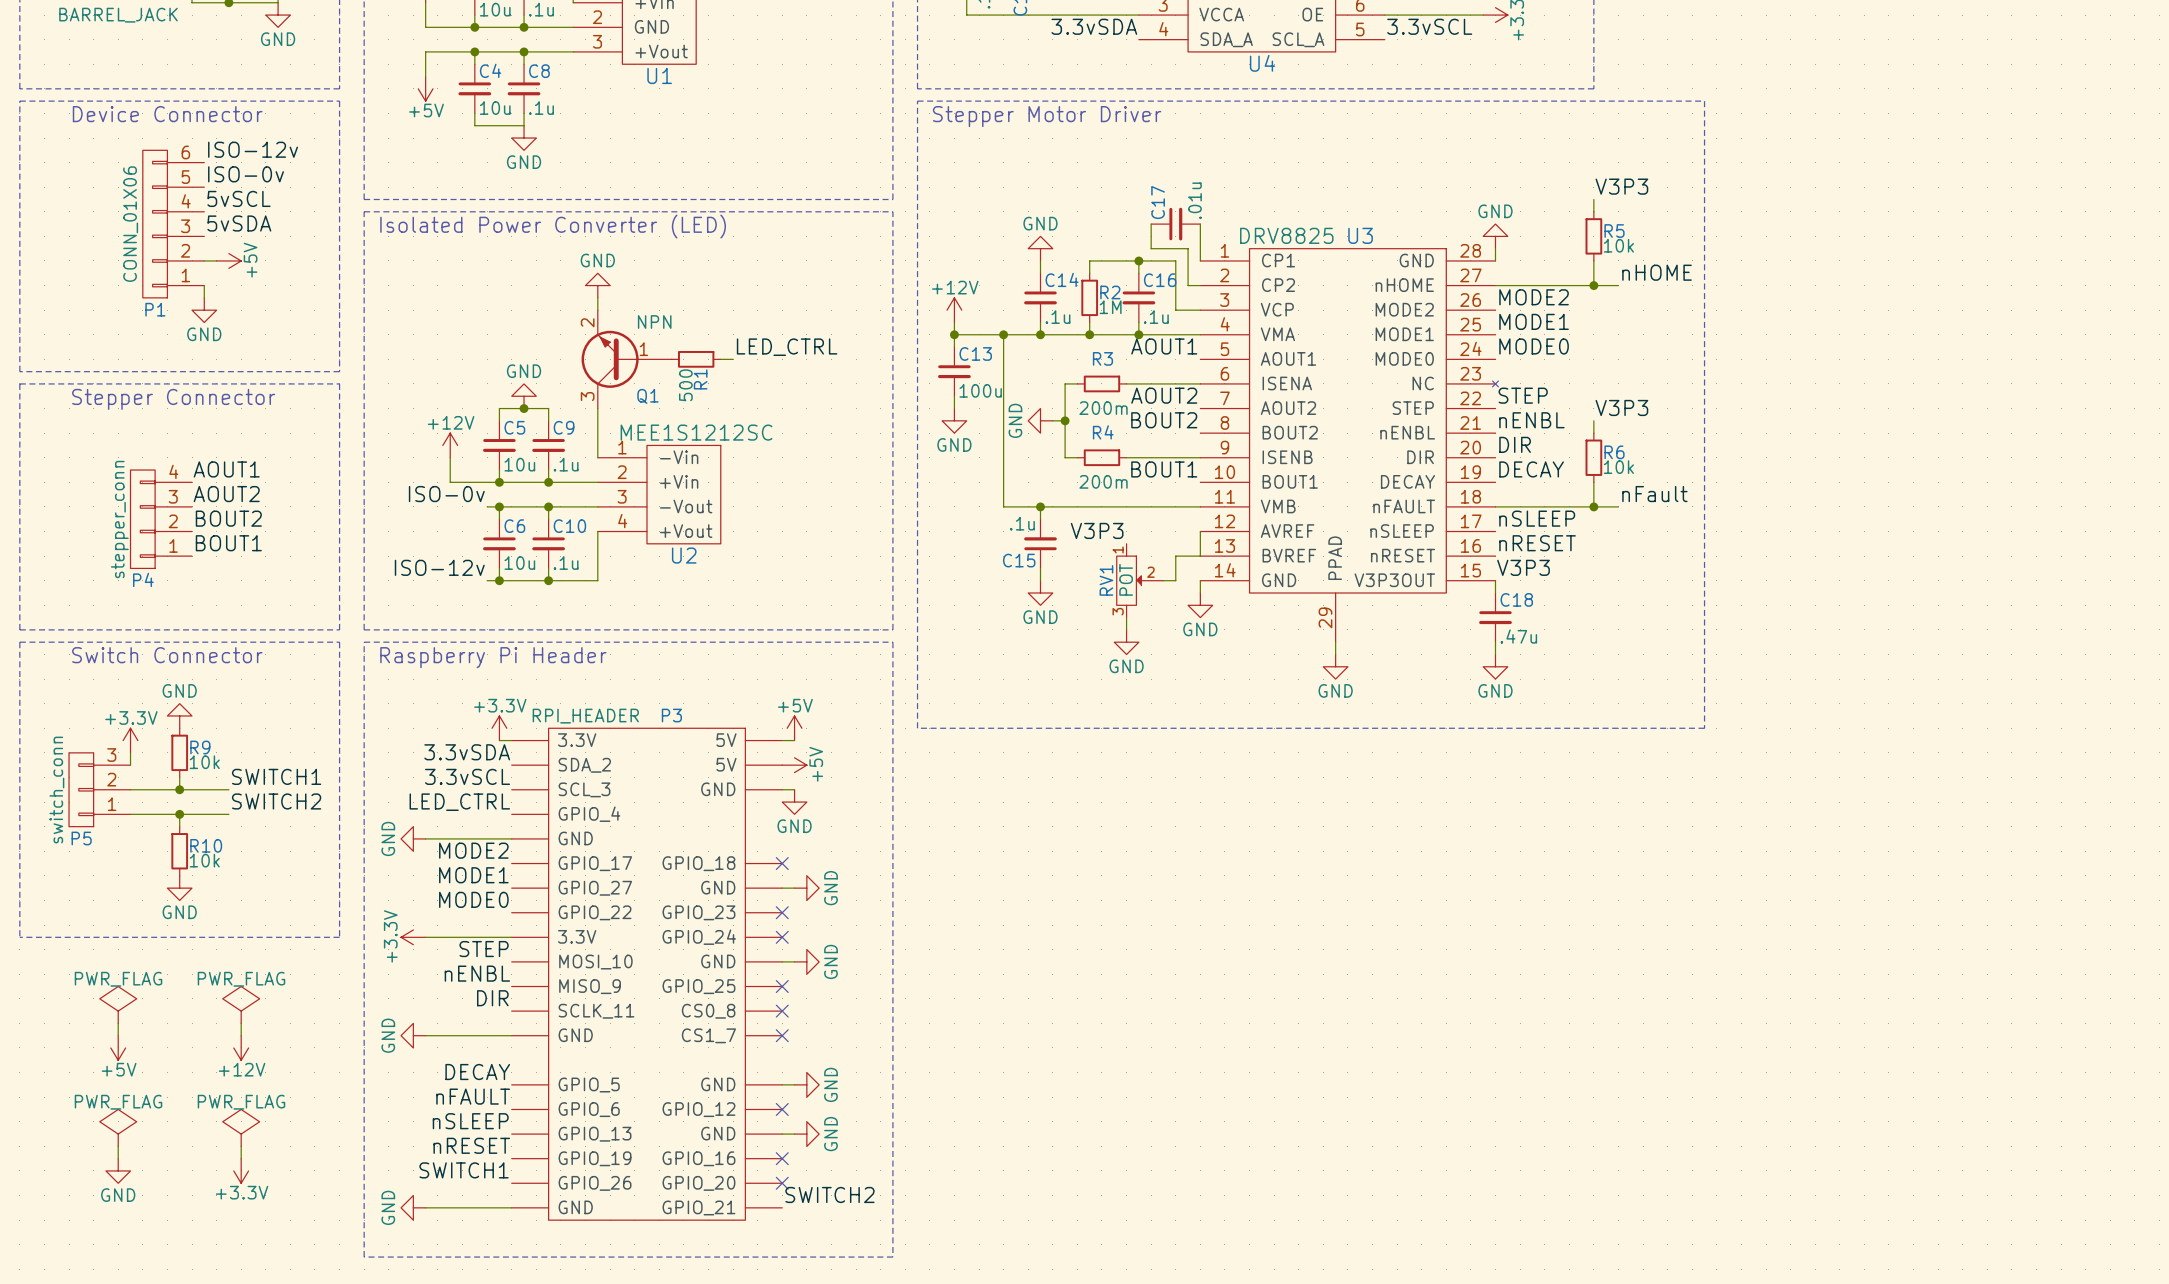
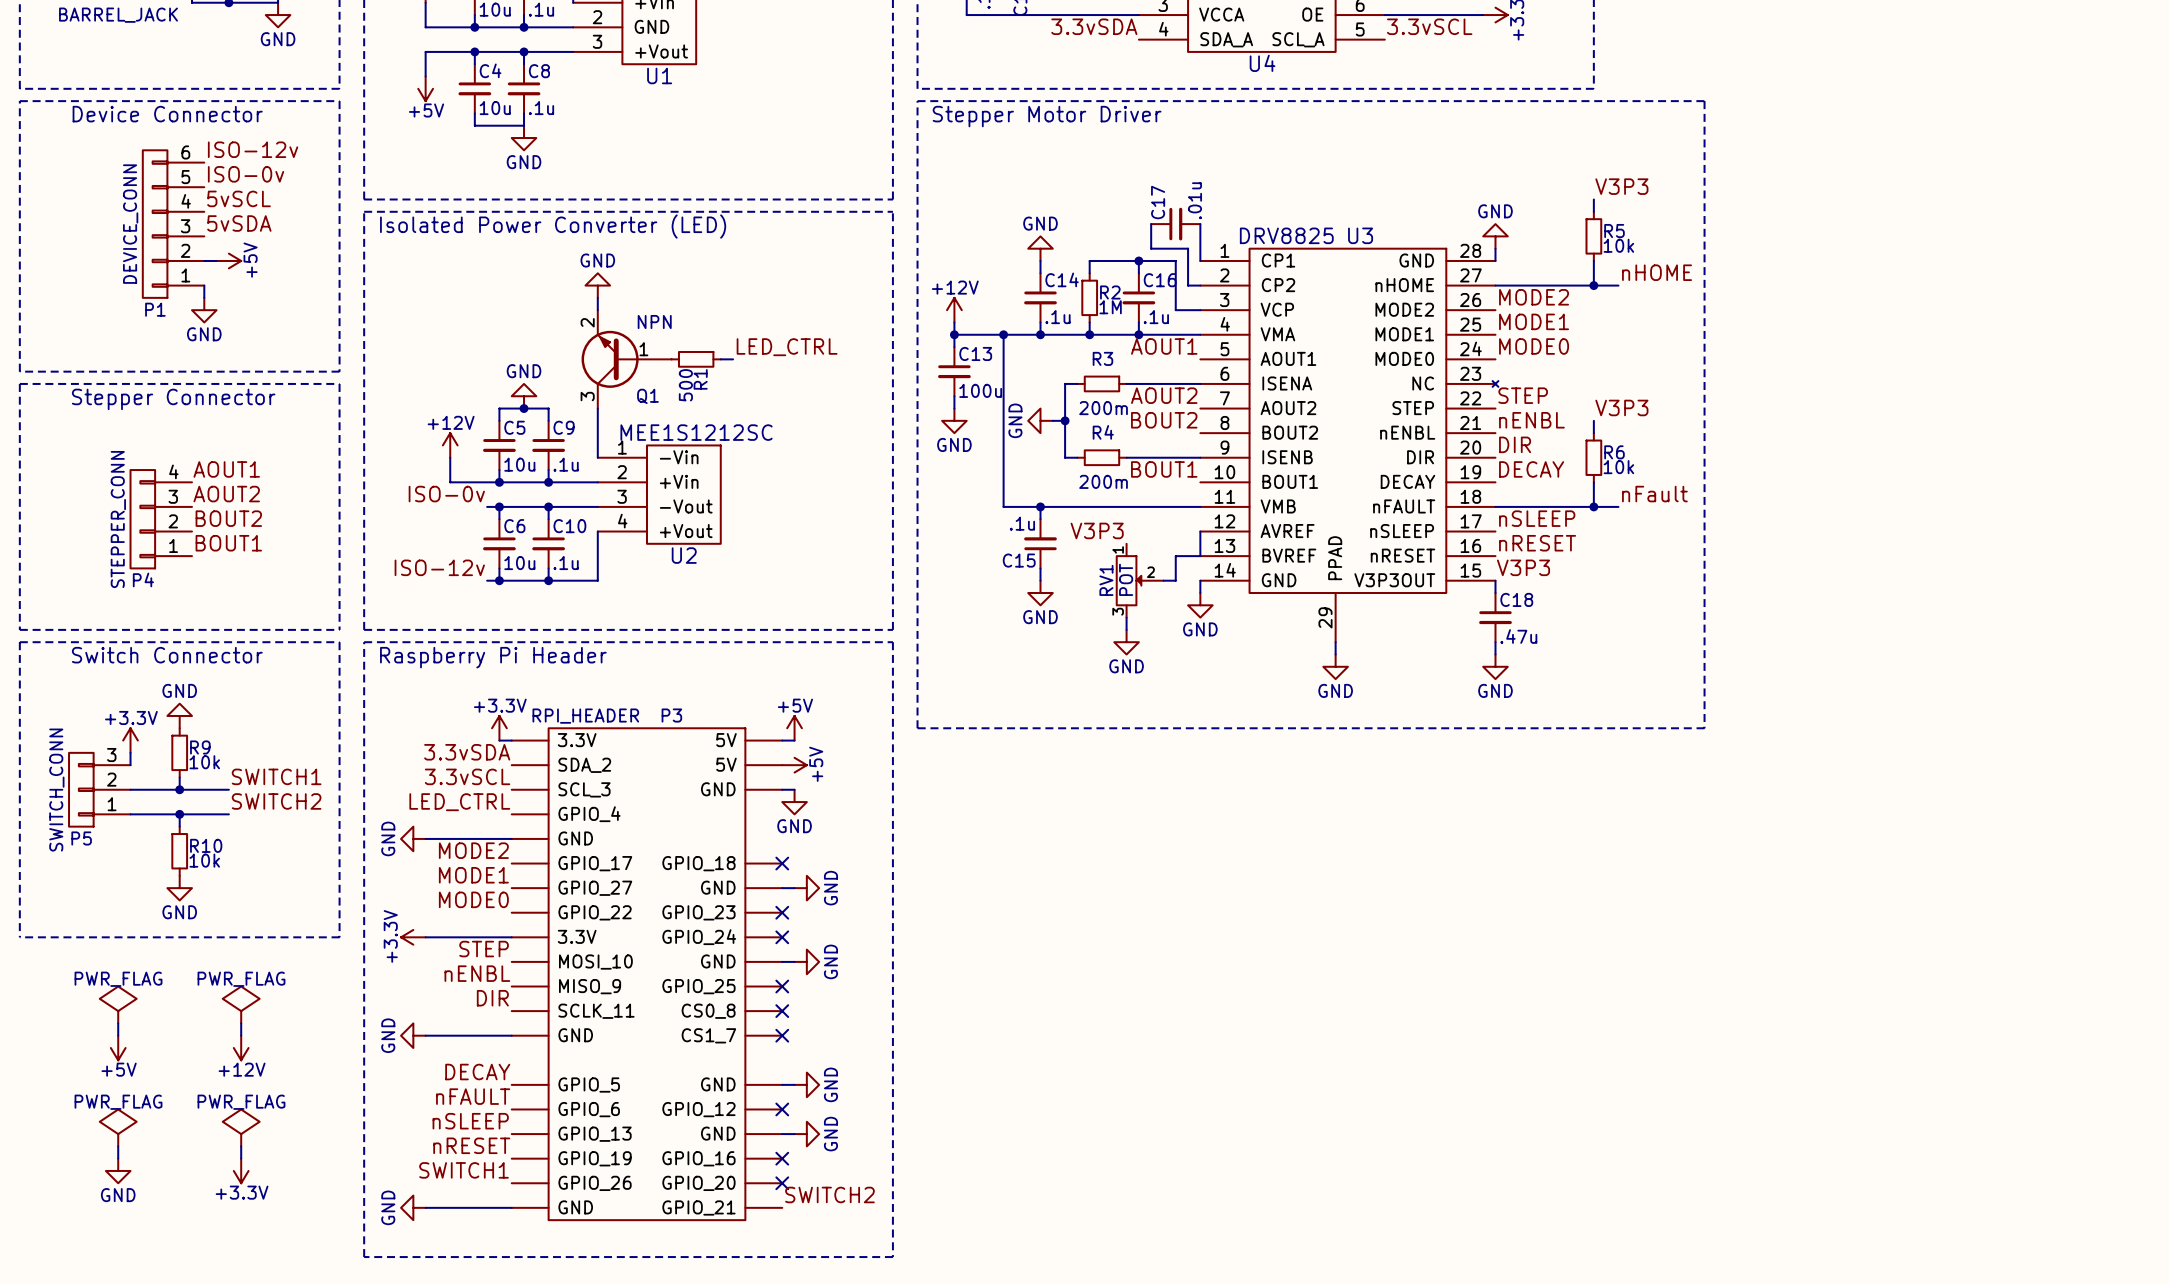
P1 value: CONN_01X06 (130, 224) -> DEVICE_CONN (130, 224)
P4 value: stepper_conn (119, 519) -> STEPPER_CONN (118, 519)
P5 value: switch_conn (56, 790) -> SWITCH_CONN (56, 790)

